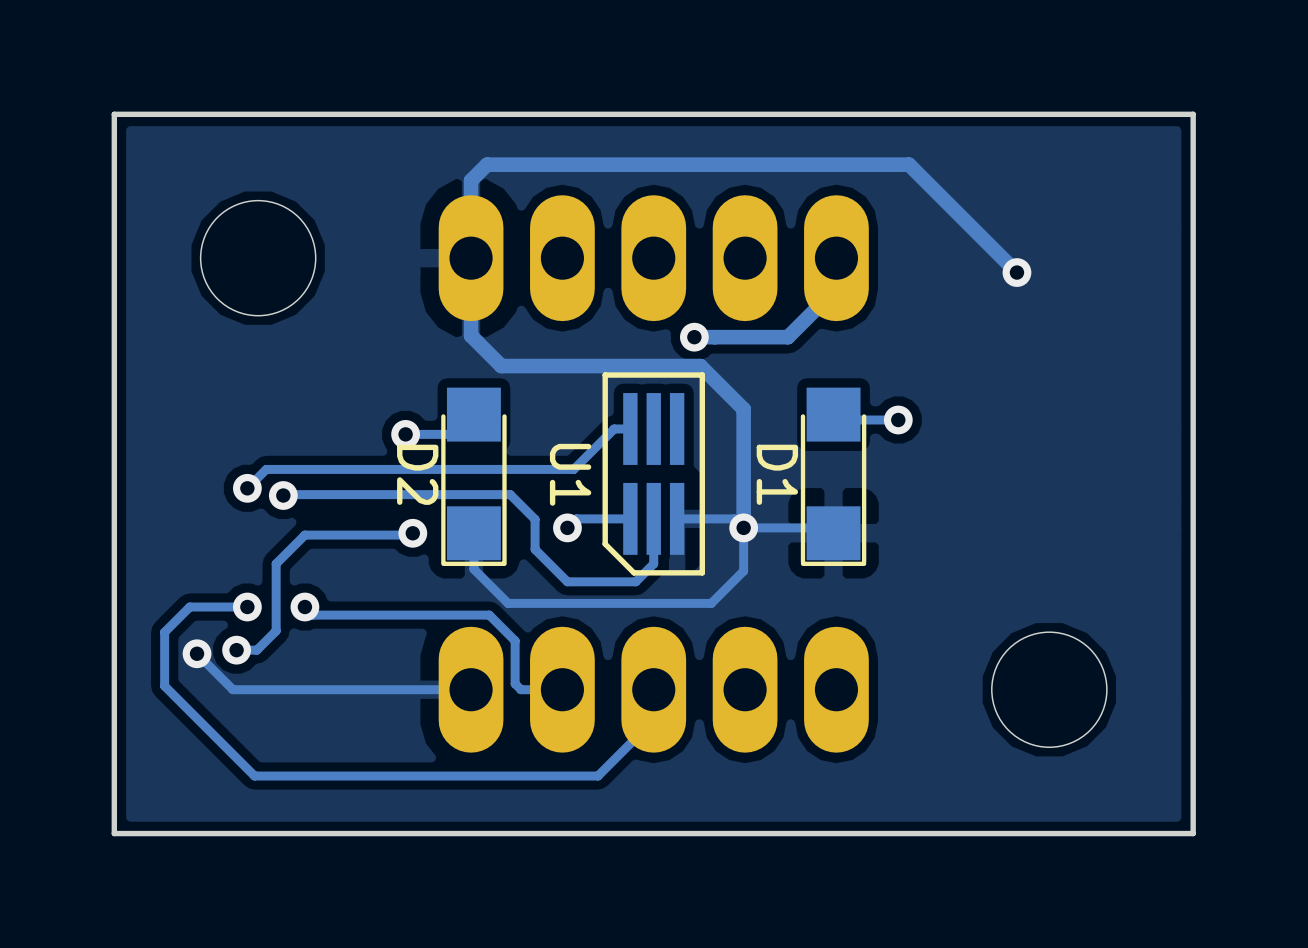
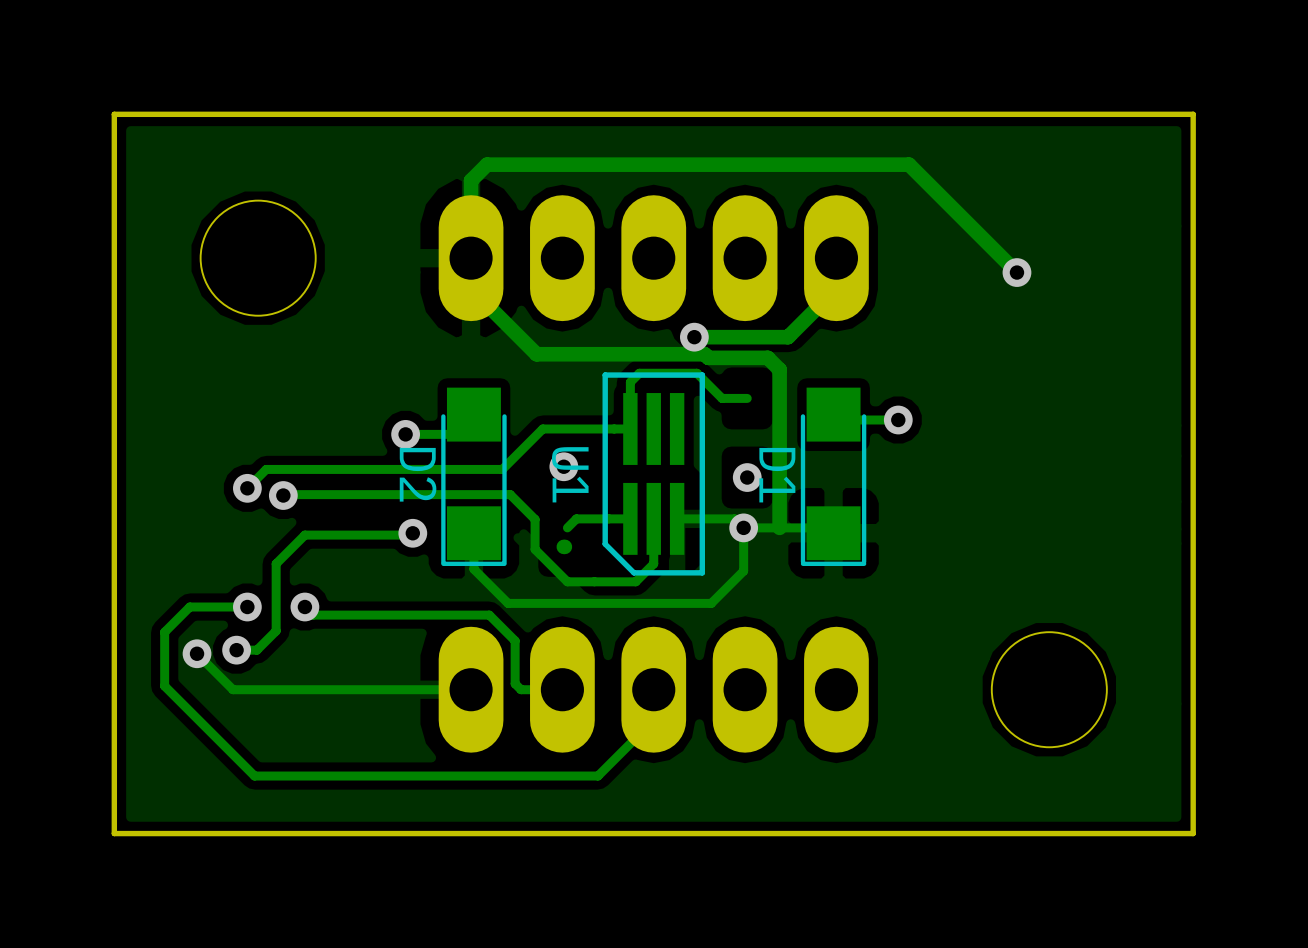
track: (471, 288) (471, 335) (501, 366) (700, 366) (743, 409) (743, 527) -> (471, 288) (536, 354) (704, 354) (708, 357) (767, 357) (779, 369) (779, 527)
track: none -> (747, 398) (722, 398) (696, 373) (639, 373) (630, 382) (630, 428)
track: (614, 428) (573, 469) (502, 469) -> (614, 428) (542, 428) (502, 469)
via: none -> (747, 477)
via position: (567, 527) -> (563, 466)
track: none -> (564, 546) (563, 546)

